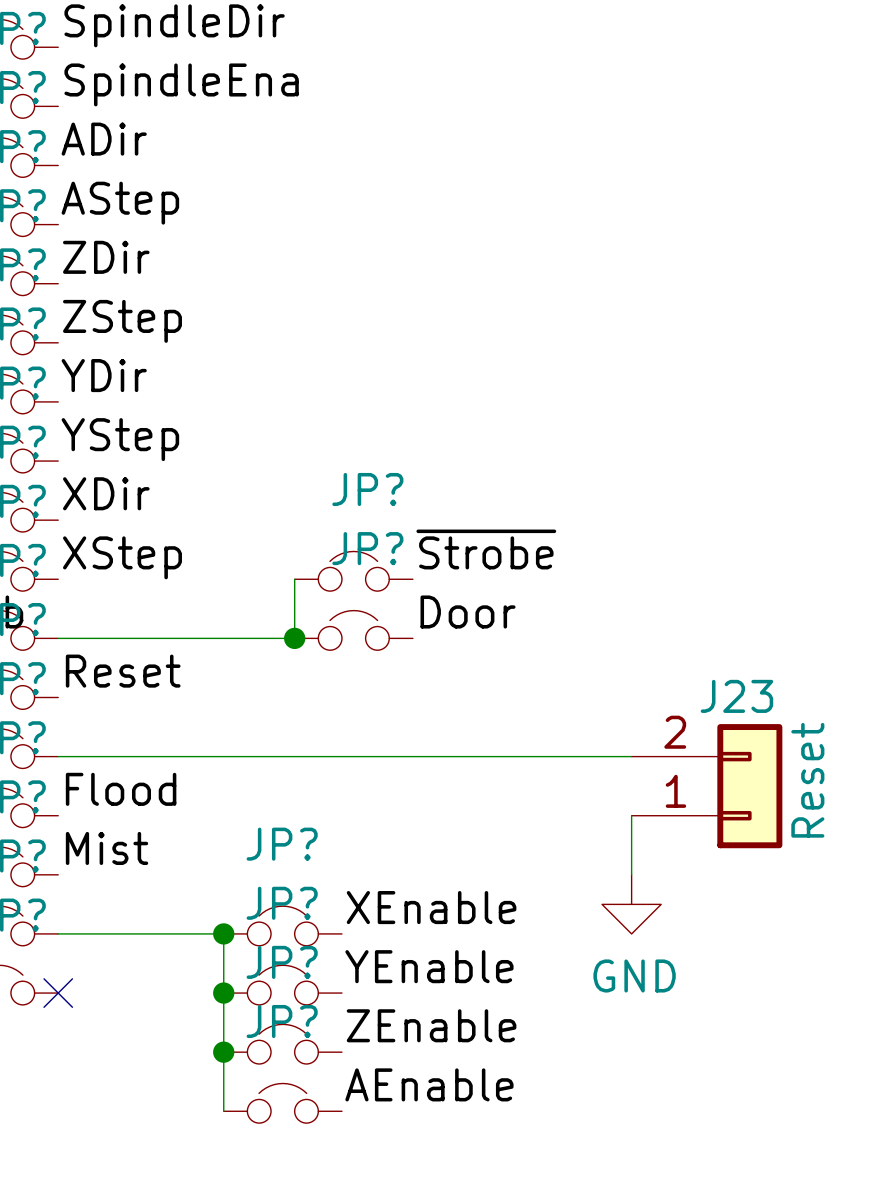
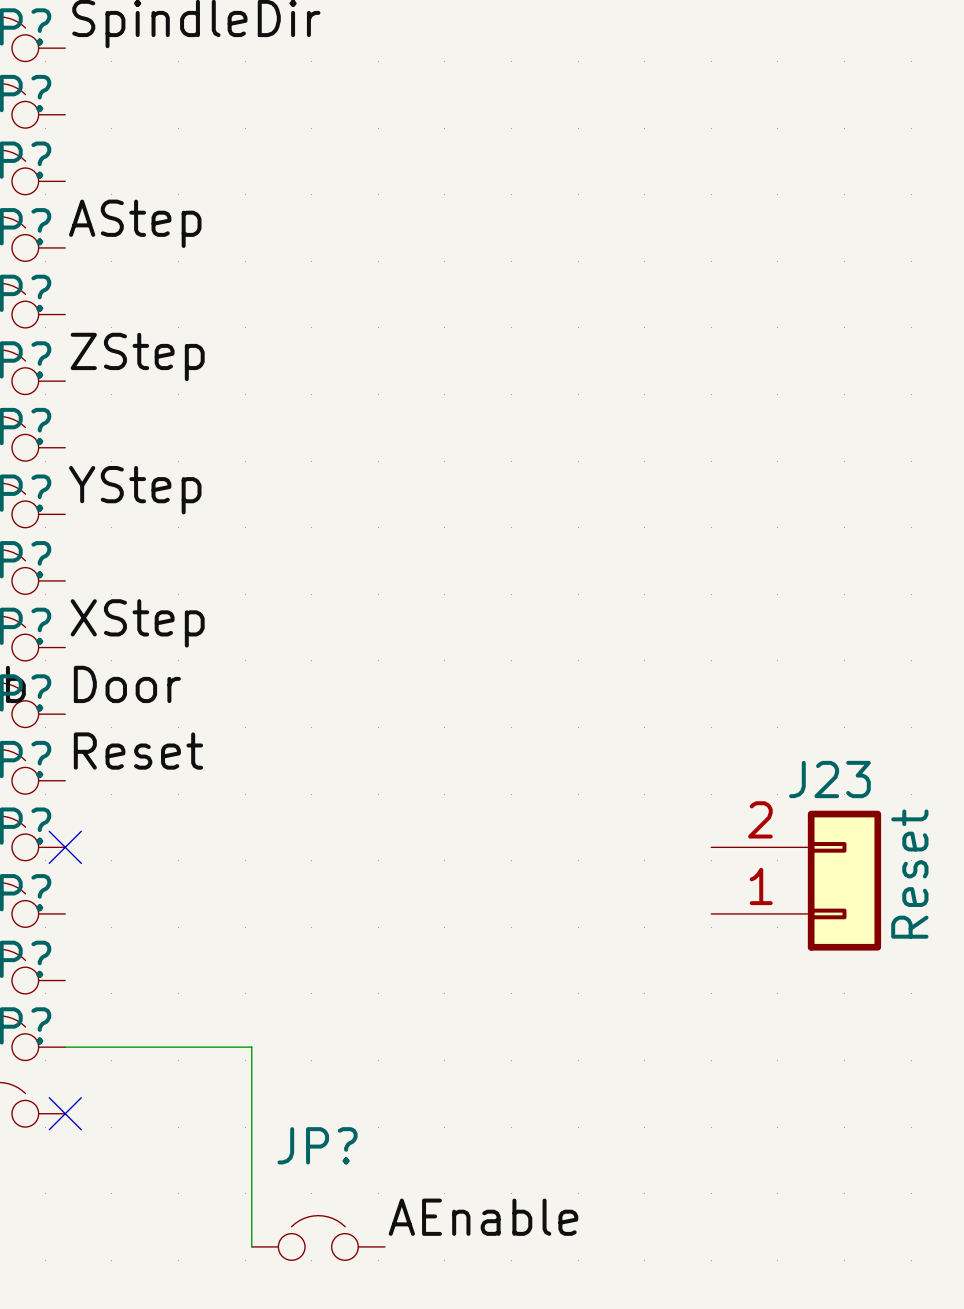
label: SpindleEna (181, 84) -> none
label: ADir (104, 139) -> none
label: ZDir (106, 257) -> none
label: YDir (104, 375) -> none
label: XDir (106, 493) -> none
label: ~{Strobe} (486, 549) -> none
JP?: (353, 571) -> none
wire: (294, 579) (294, 638) (58, 638) -> none
label position: Door (468, 612) -> Door (127, 684)
JP?: (353, 630) -> none
junction: (294, 638) -> none
wire: (58, 756) (631, 756) -> none
no-connect mark: none -> (65, 847)
label: Flood (121, 789) -> none
wire: (631, 815) (631, 874) -> none
label: Mist (107, 848) -> none
power symbol: GND (631, 904) -> none
label: XEnable (431, 907) -> none
JP?: (282, 925) -> none
junction: (223, 933) -> none
label: YEnable (429, 966) -> none
JP?: (282, 985) -> none
junction: (223, 993) -> none
label: ZEnable (431, 1025) -> none
JP?: (282, 1044) -> none
junction: (223, 1052) -> none

